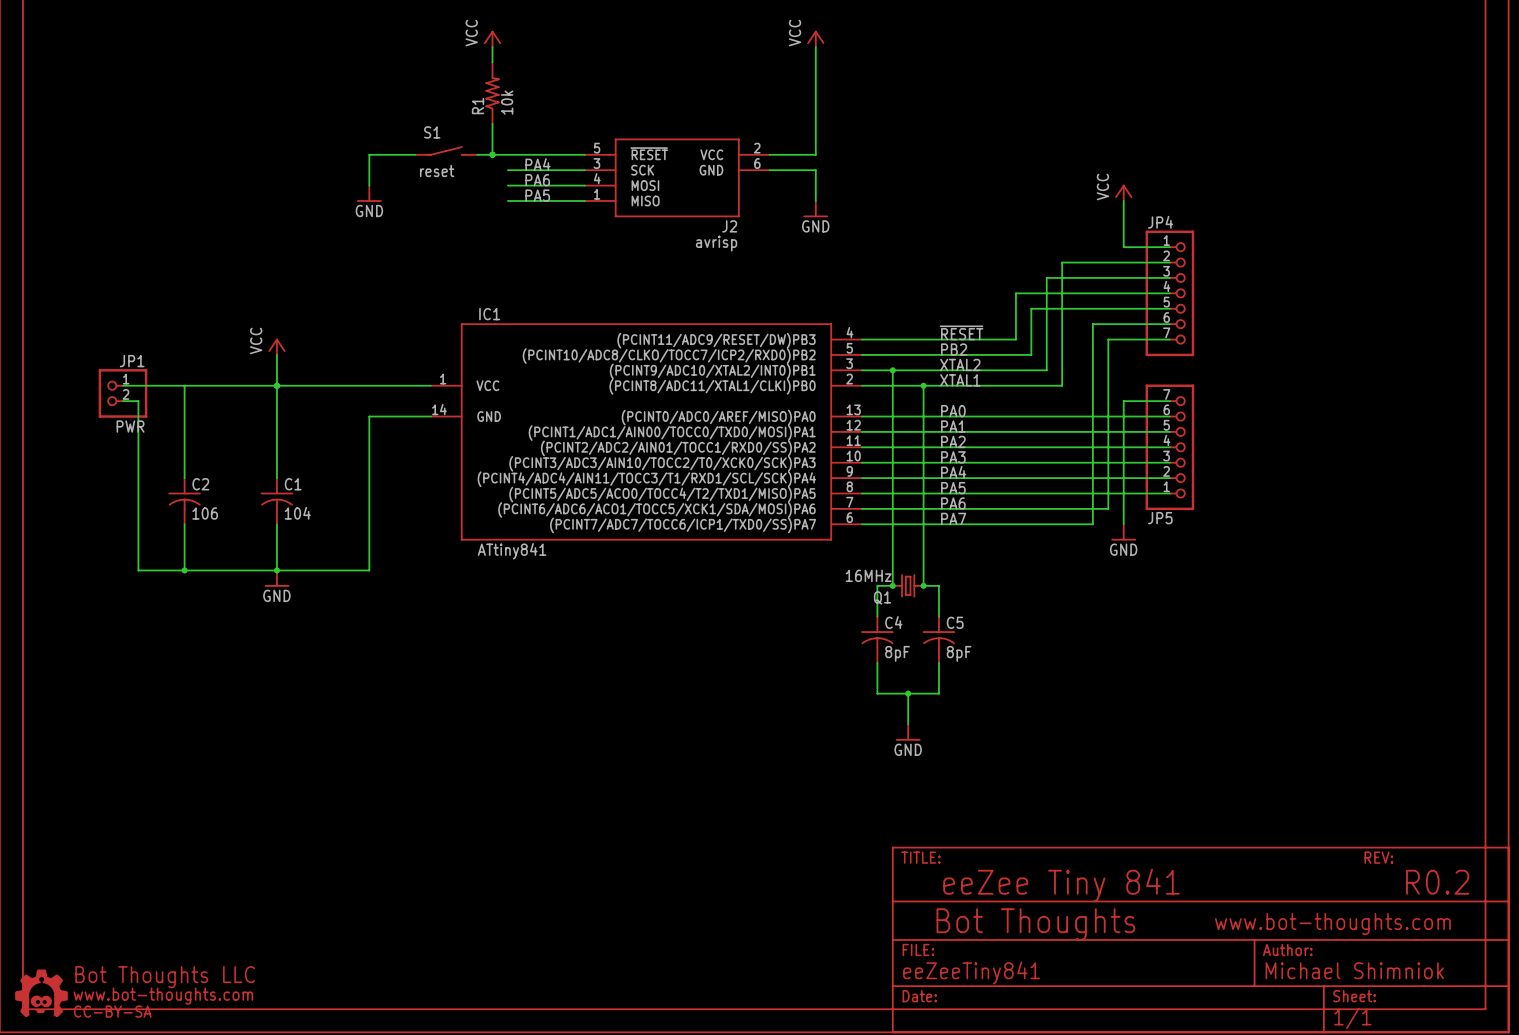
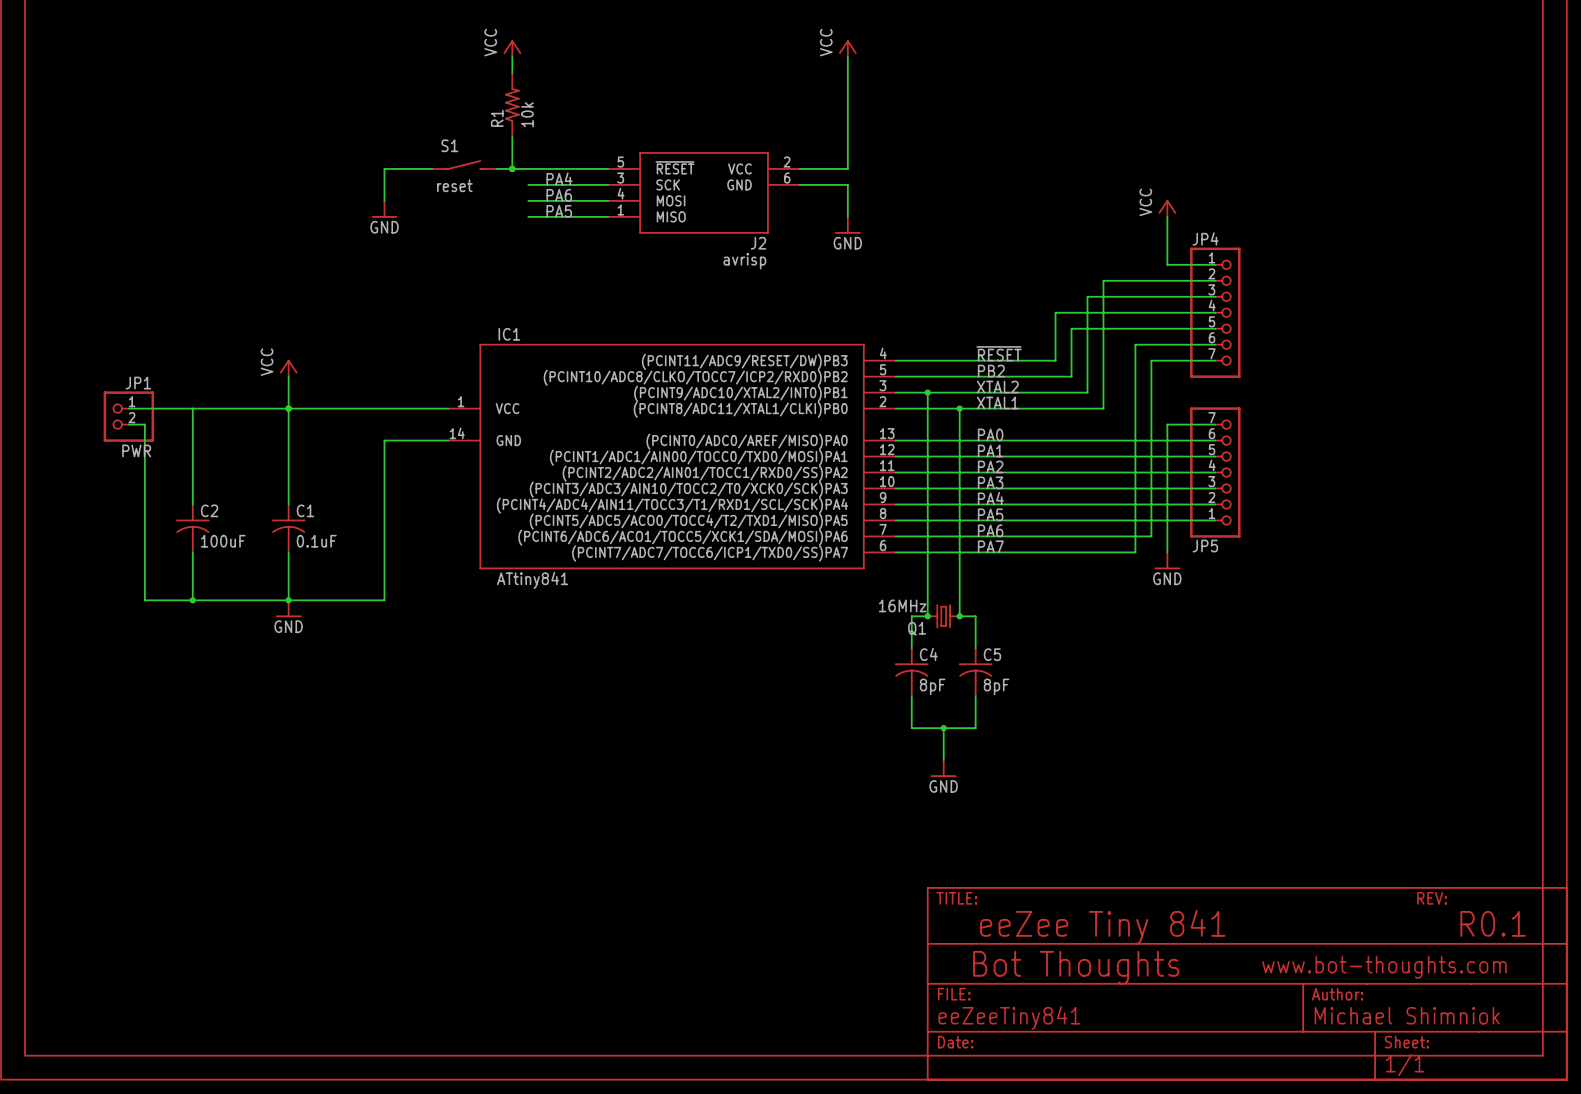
C2 value: 106 (205, 513) -> 100uF (223, 541)
C1 value: 104 (297, 513) -> 0.1uF (316, 541)
text: R0.2 (1437, 882) -> R0.1 (1493, 923)
part: (41, 993) -> none

